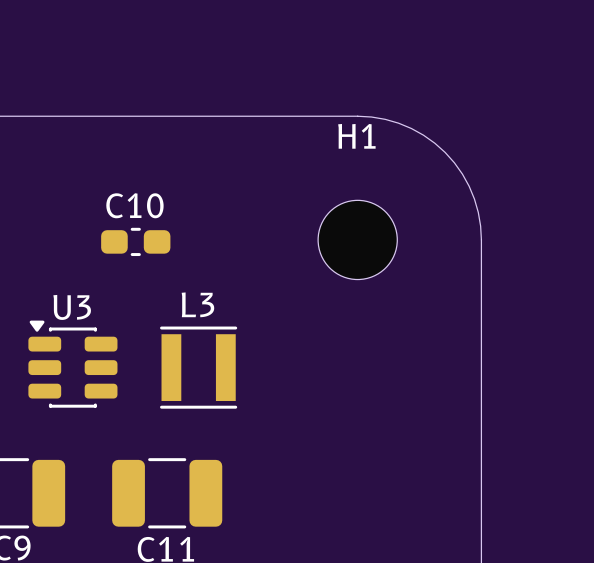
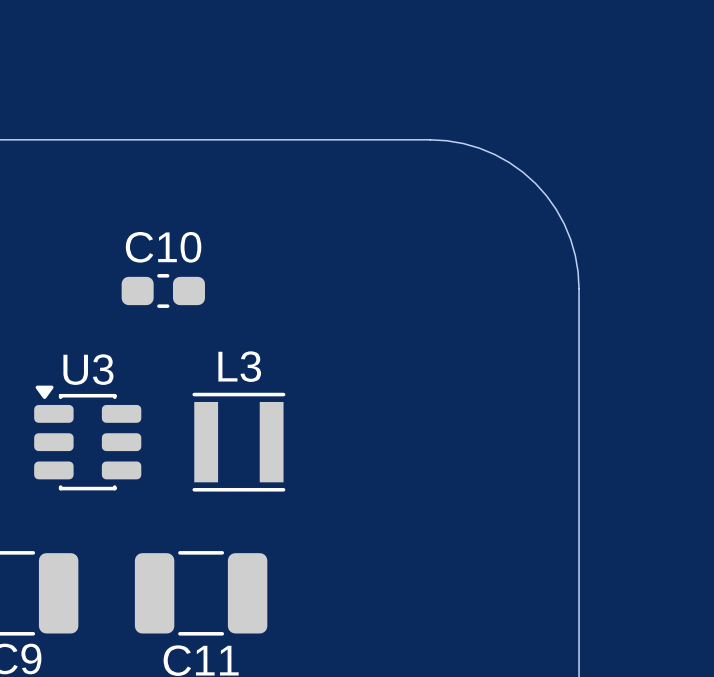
H1: (357, 239) -> none

